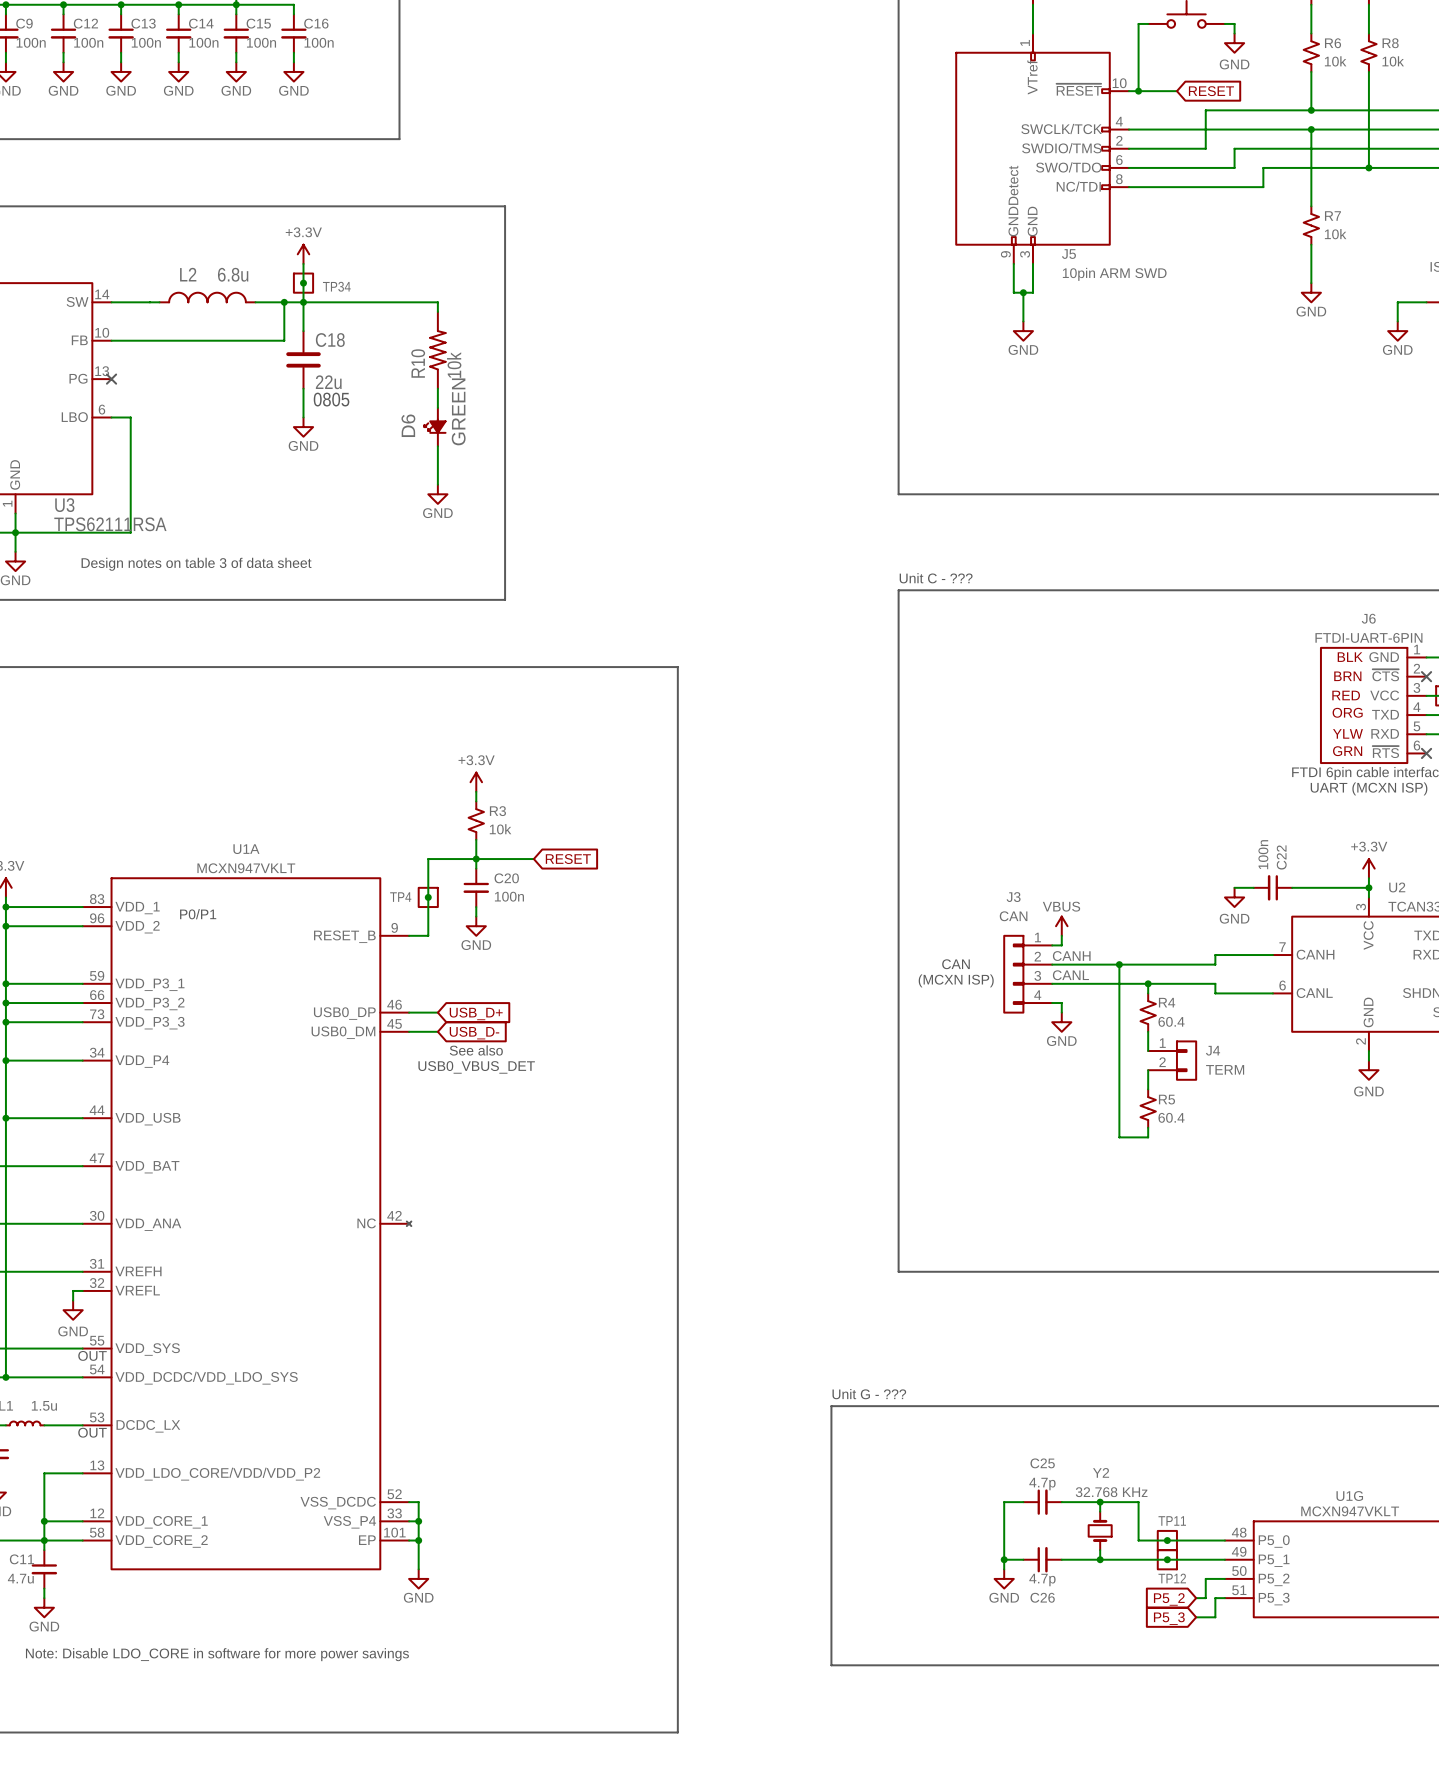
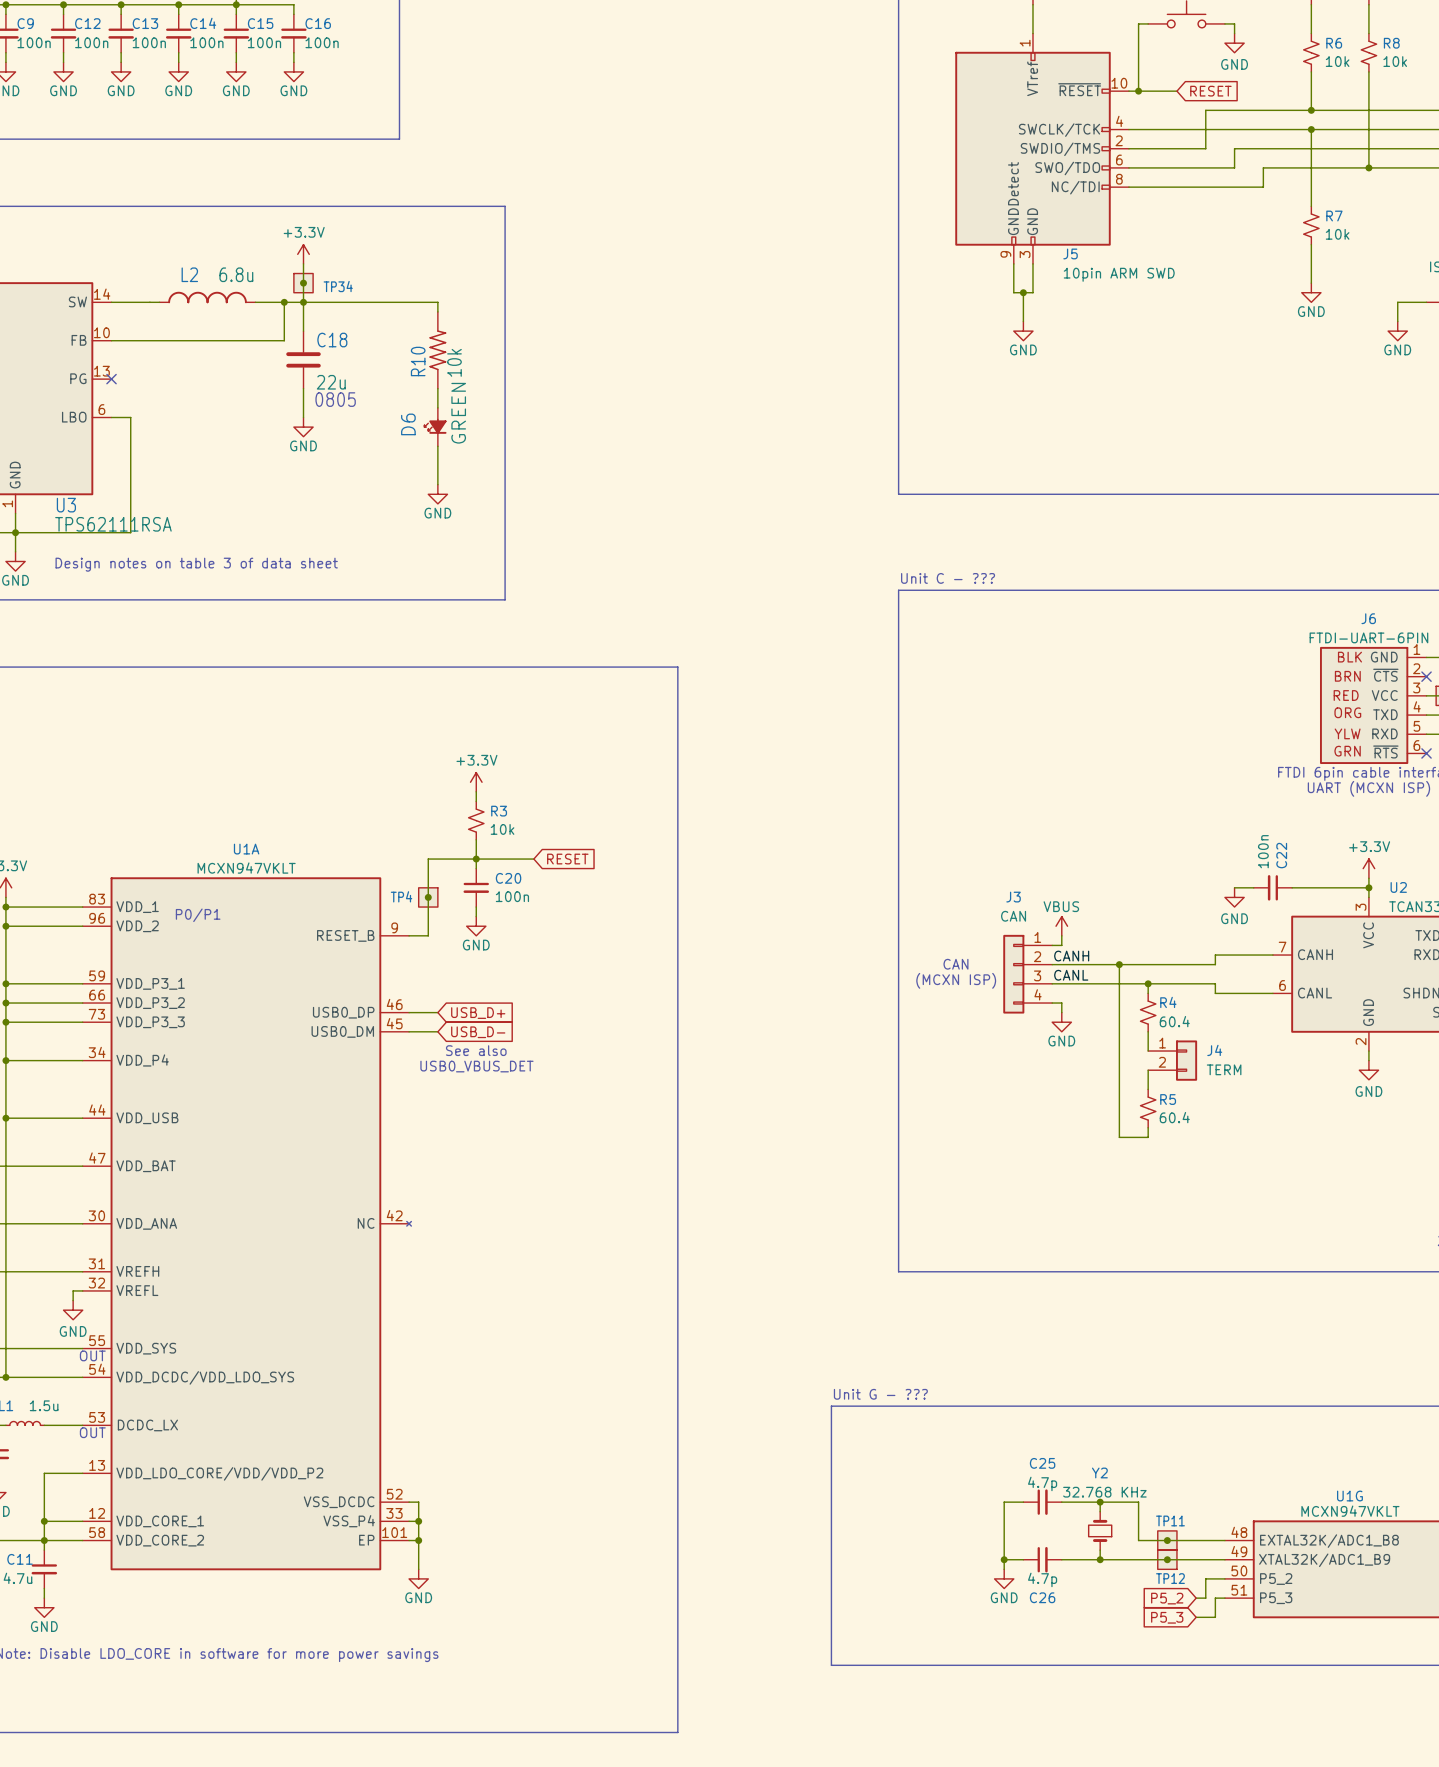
U1G pin name: P5_0 (1274, 1541) -> EXTAL32K/ADC1_B8 (1329, 1541)
U1G pin name: P5_1 (1274, 1560) -> XTAL32K/ADC1_B9 (1324, 1560)

